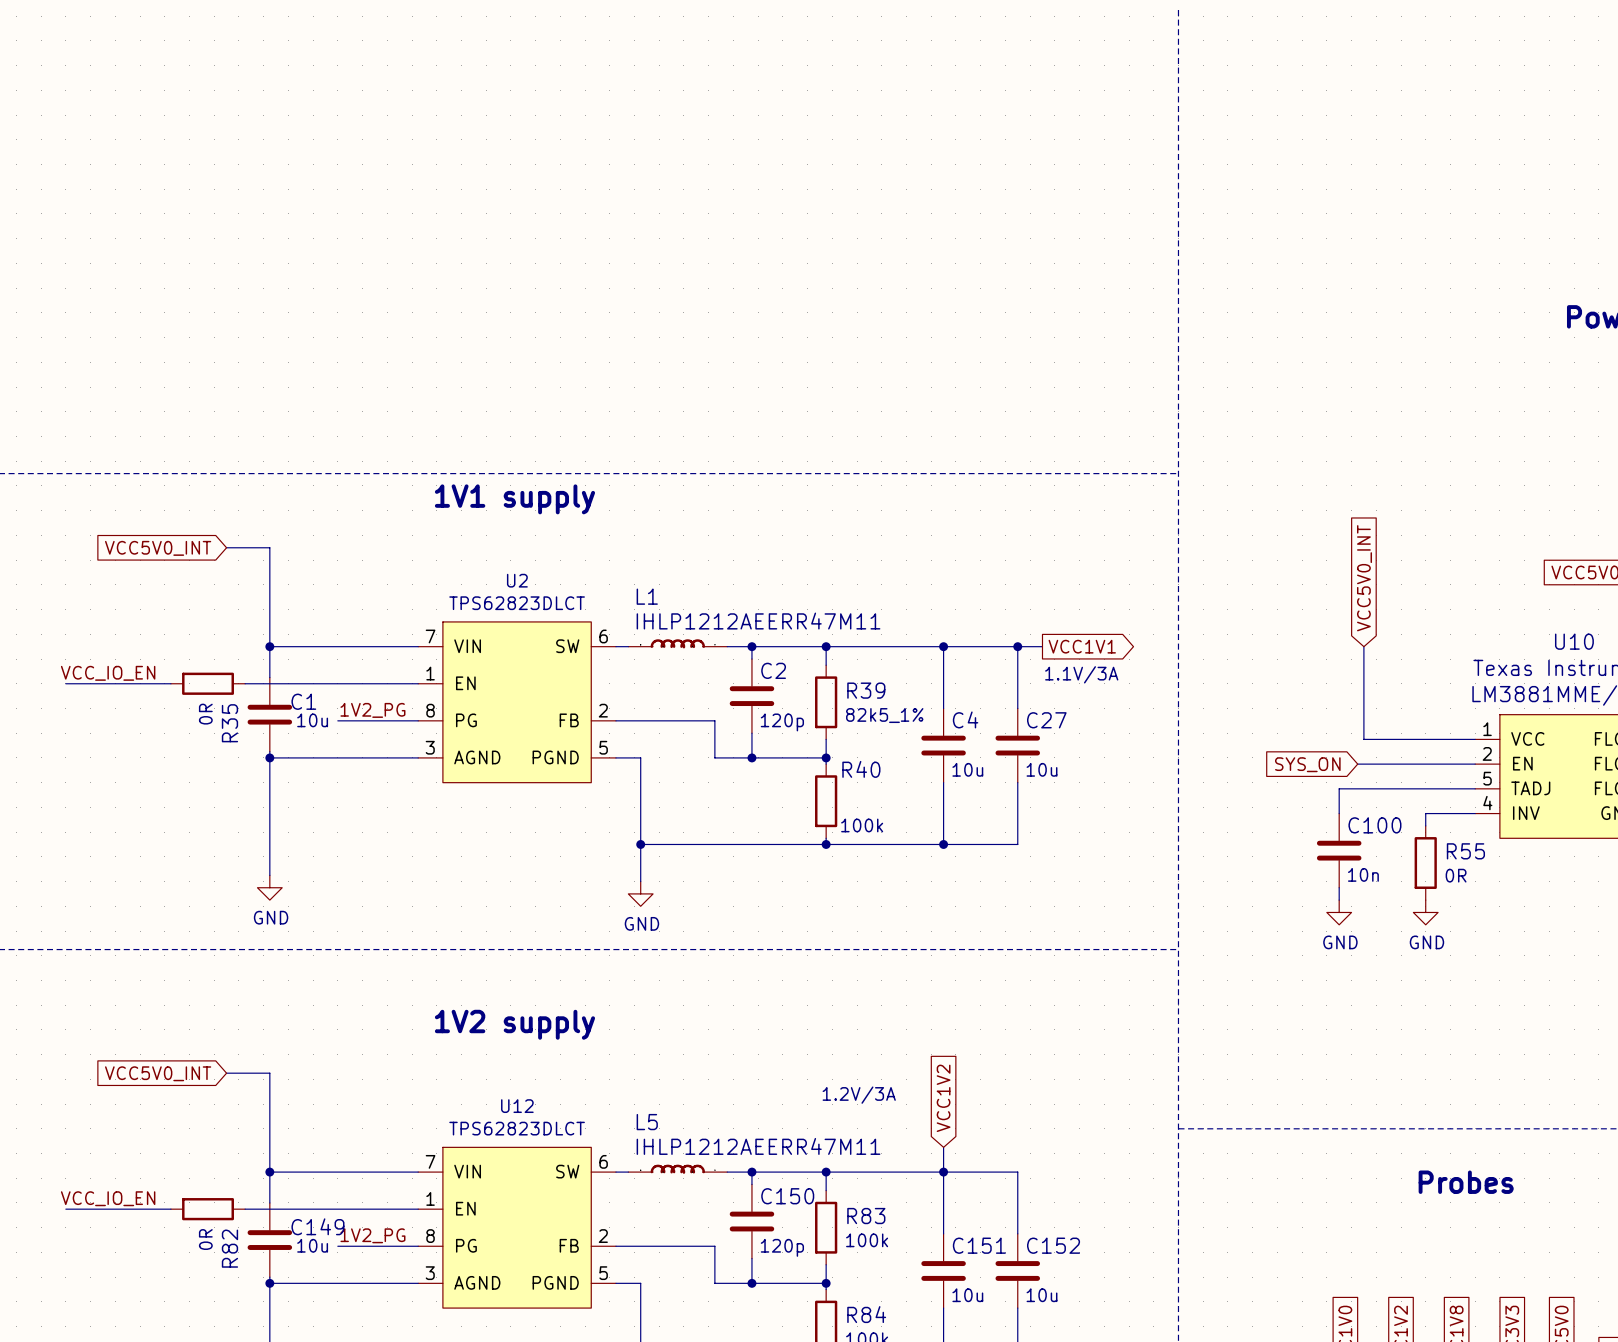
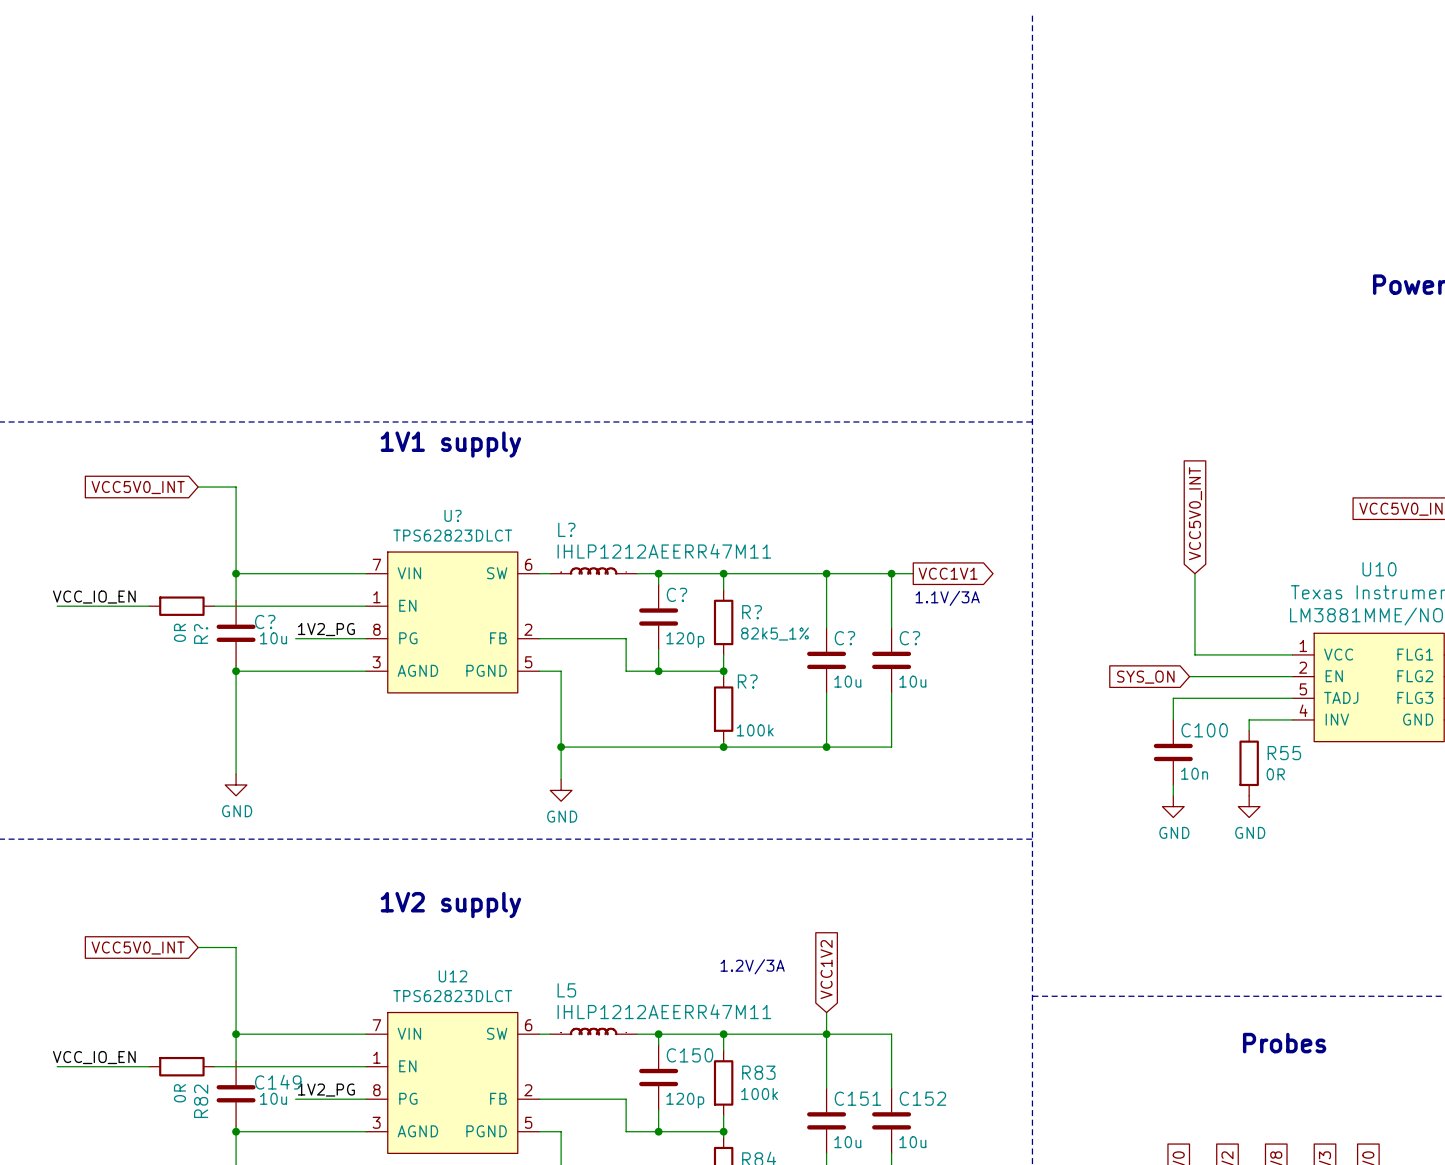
U2 name: U2 (517, 580) -> U? (453, 515)
L1 name: L1 (647, 596) -> L? (566, 529)
C2 name: C2 (773, 670) -> C? (676, 594)
R39 name: R39 (866, 690) -> R? (752, 612)
C1 name: C1 (303, 701) -> C? (265, 621)
C4 name: C4 (965, 719) -> C? (844, 638)
C27 name: C27 (1046, 720) -> C? (909, 638)
R35 name: R35 (229, 723) -> R? (201, 633)
R40 name: R40 (861, 769) -> R? (747, 681)

